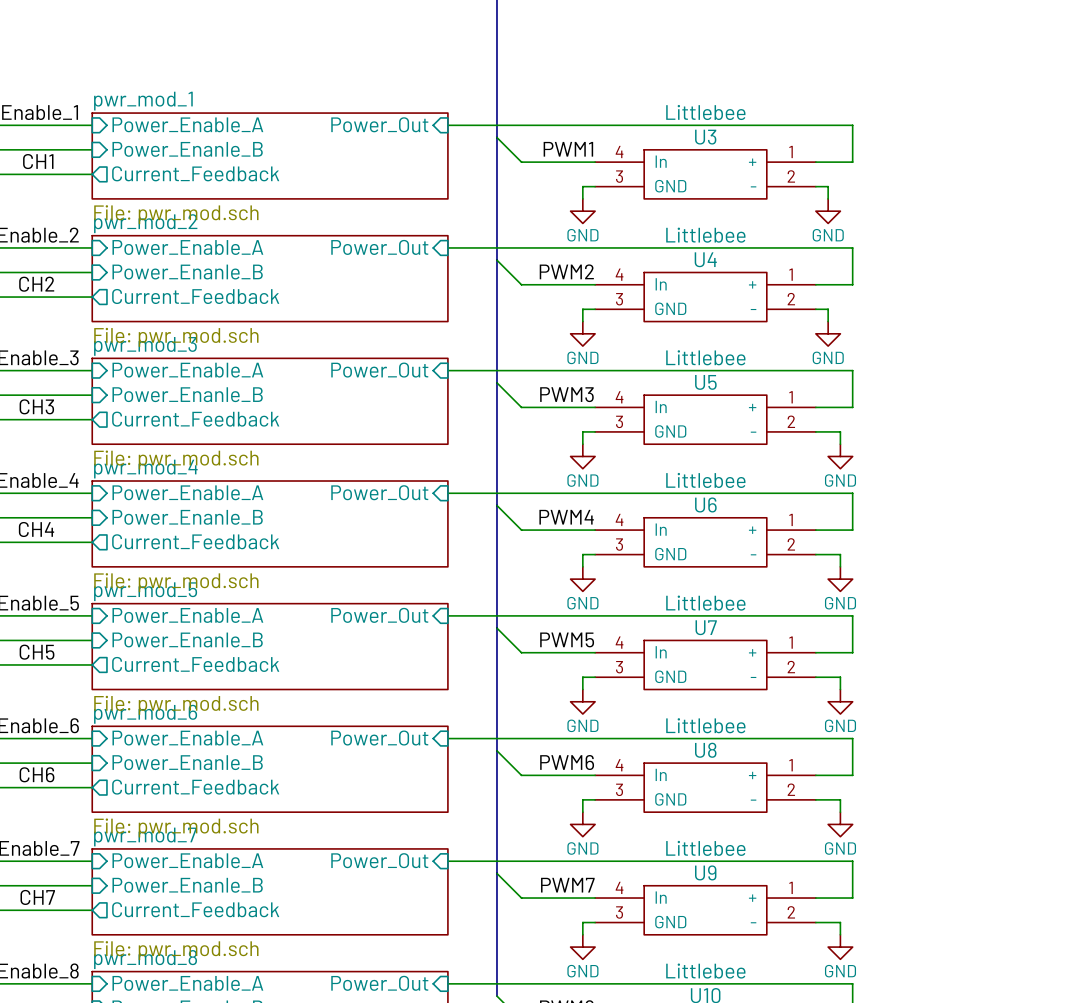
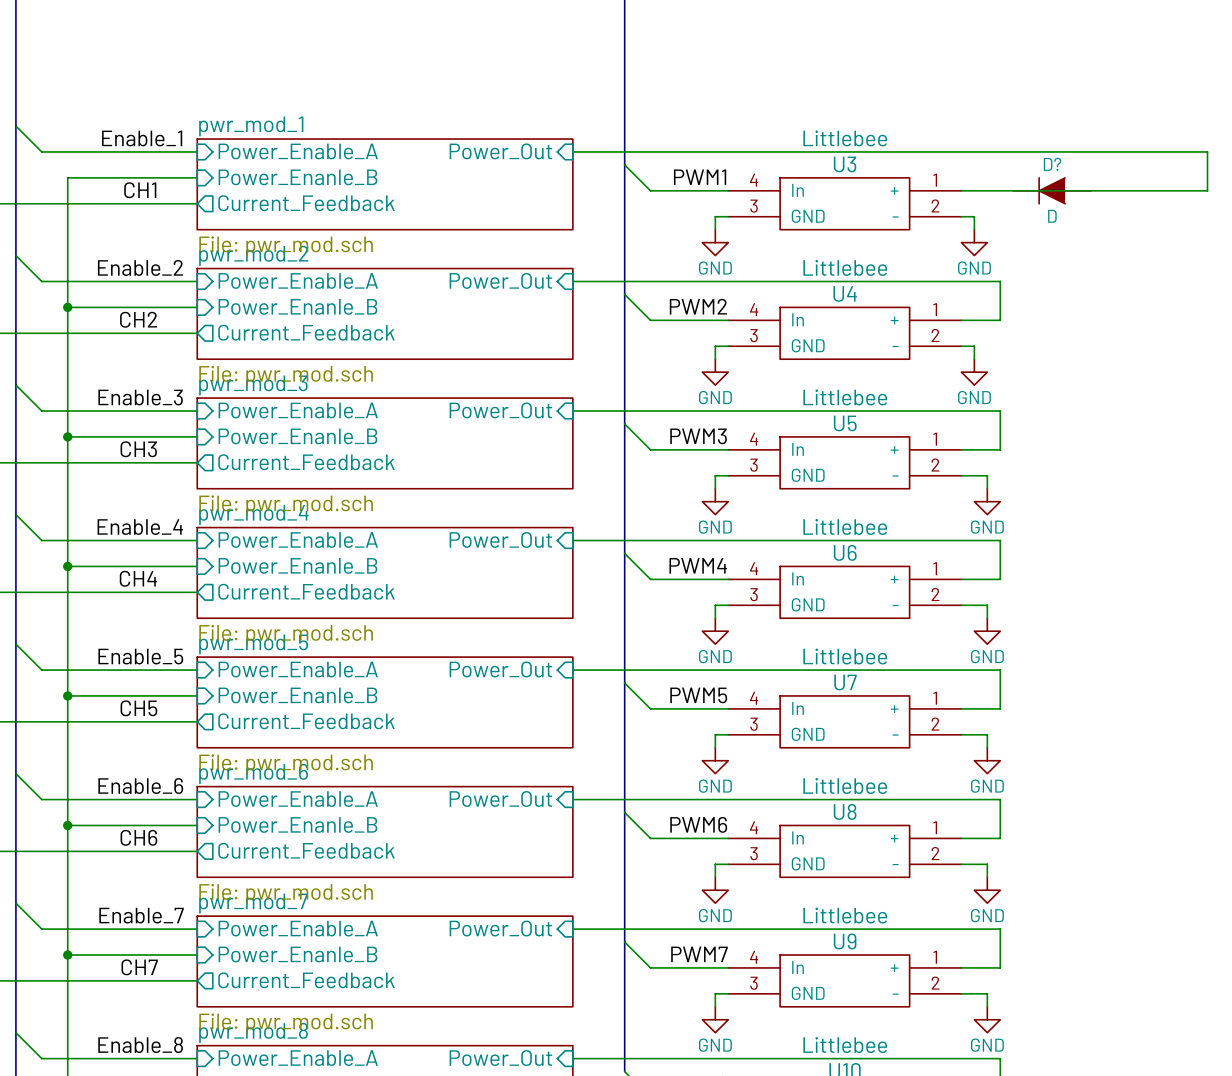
wire: (852, 125) (852, 162) -> (1000, 151) (1207, 151) (1207, 190) (1000, 190)
D?: none -> D (1052, 190)

